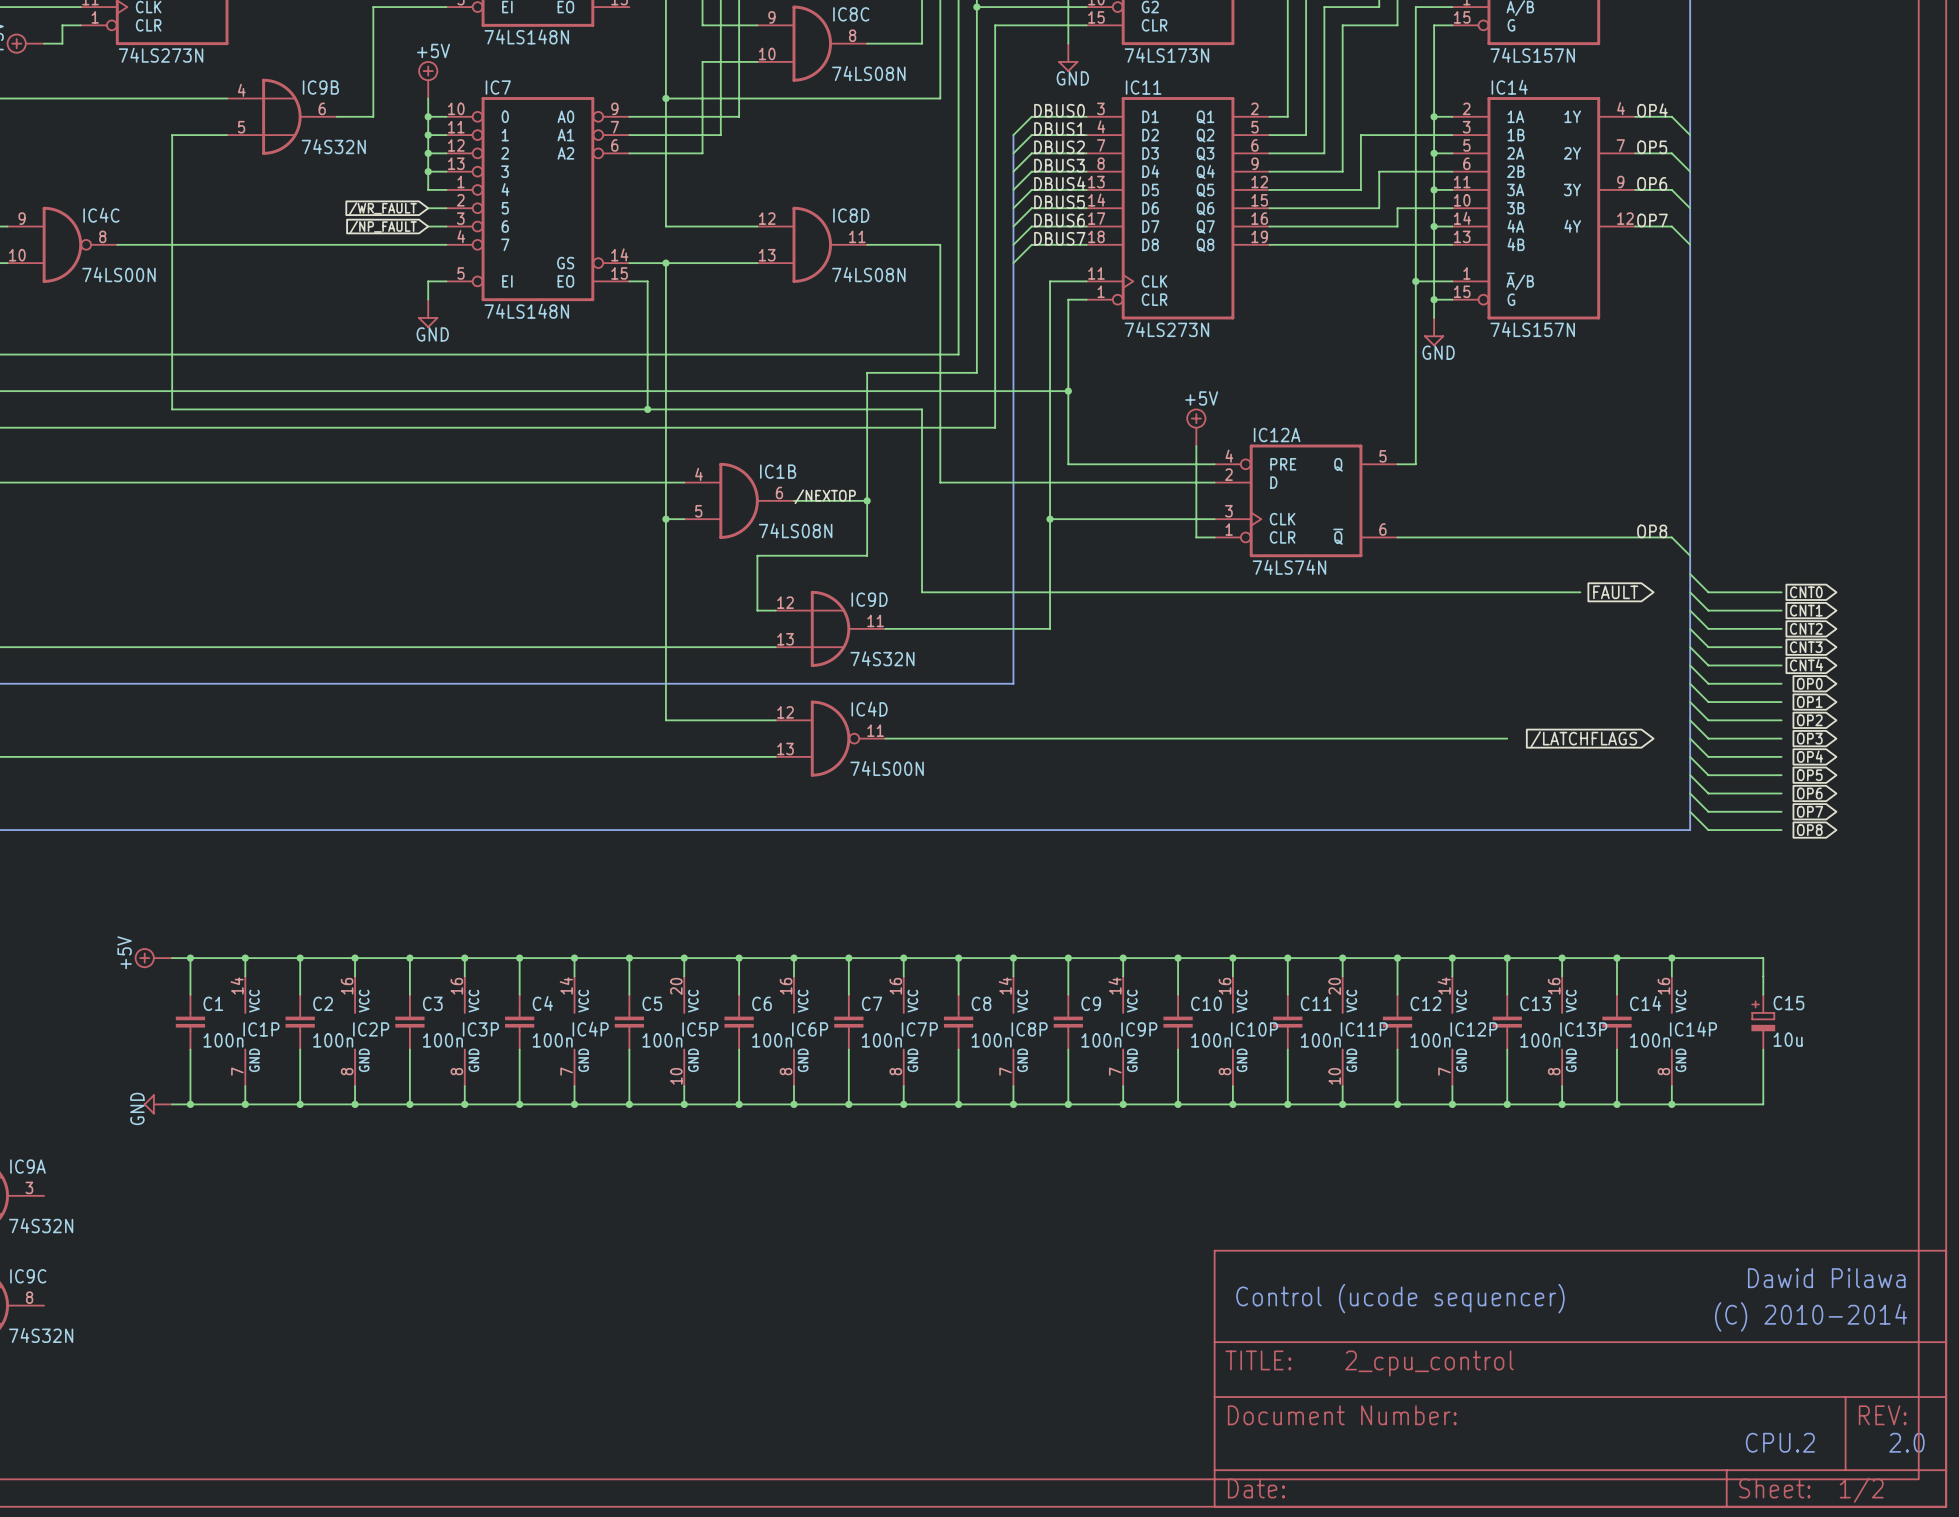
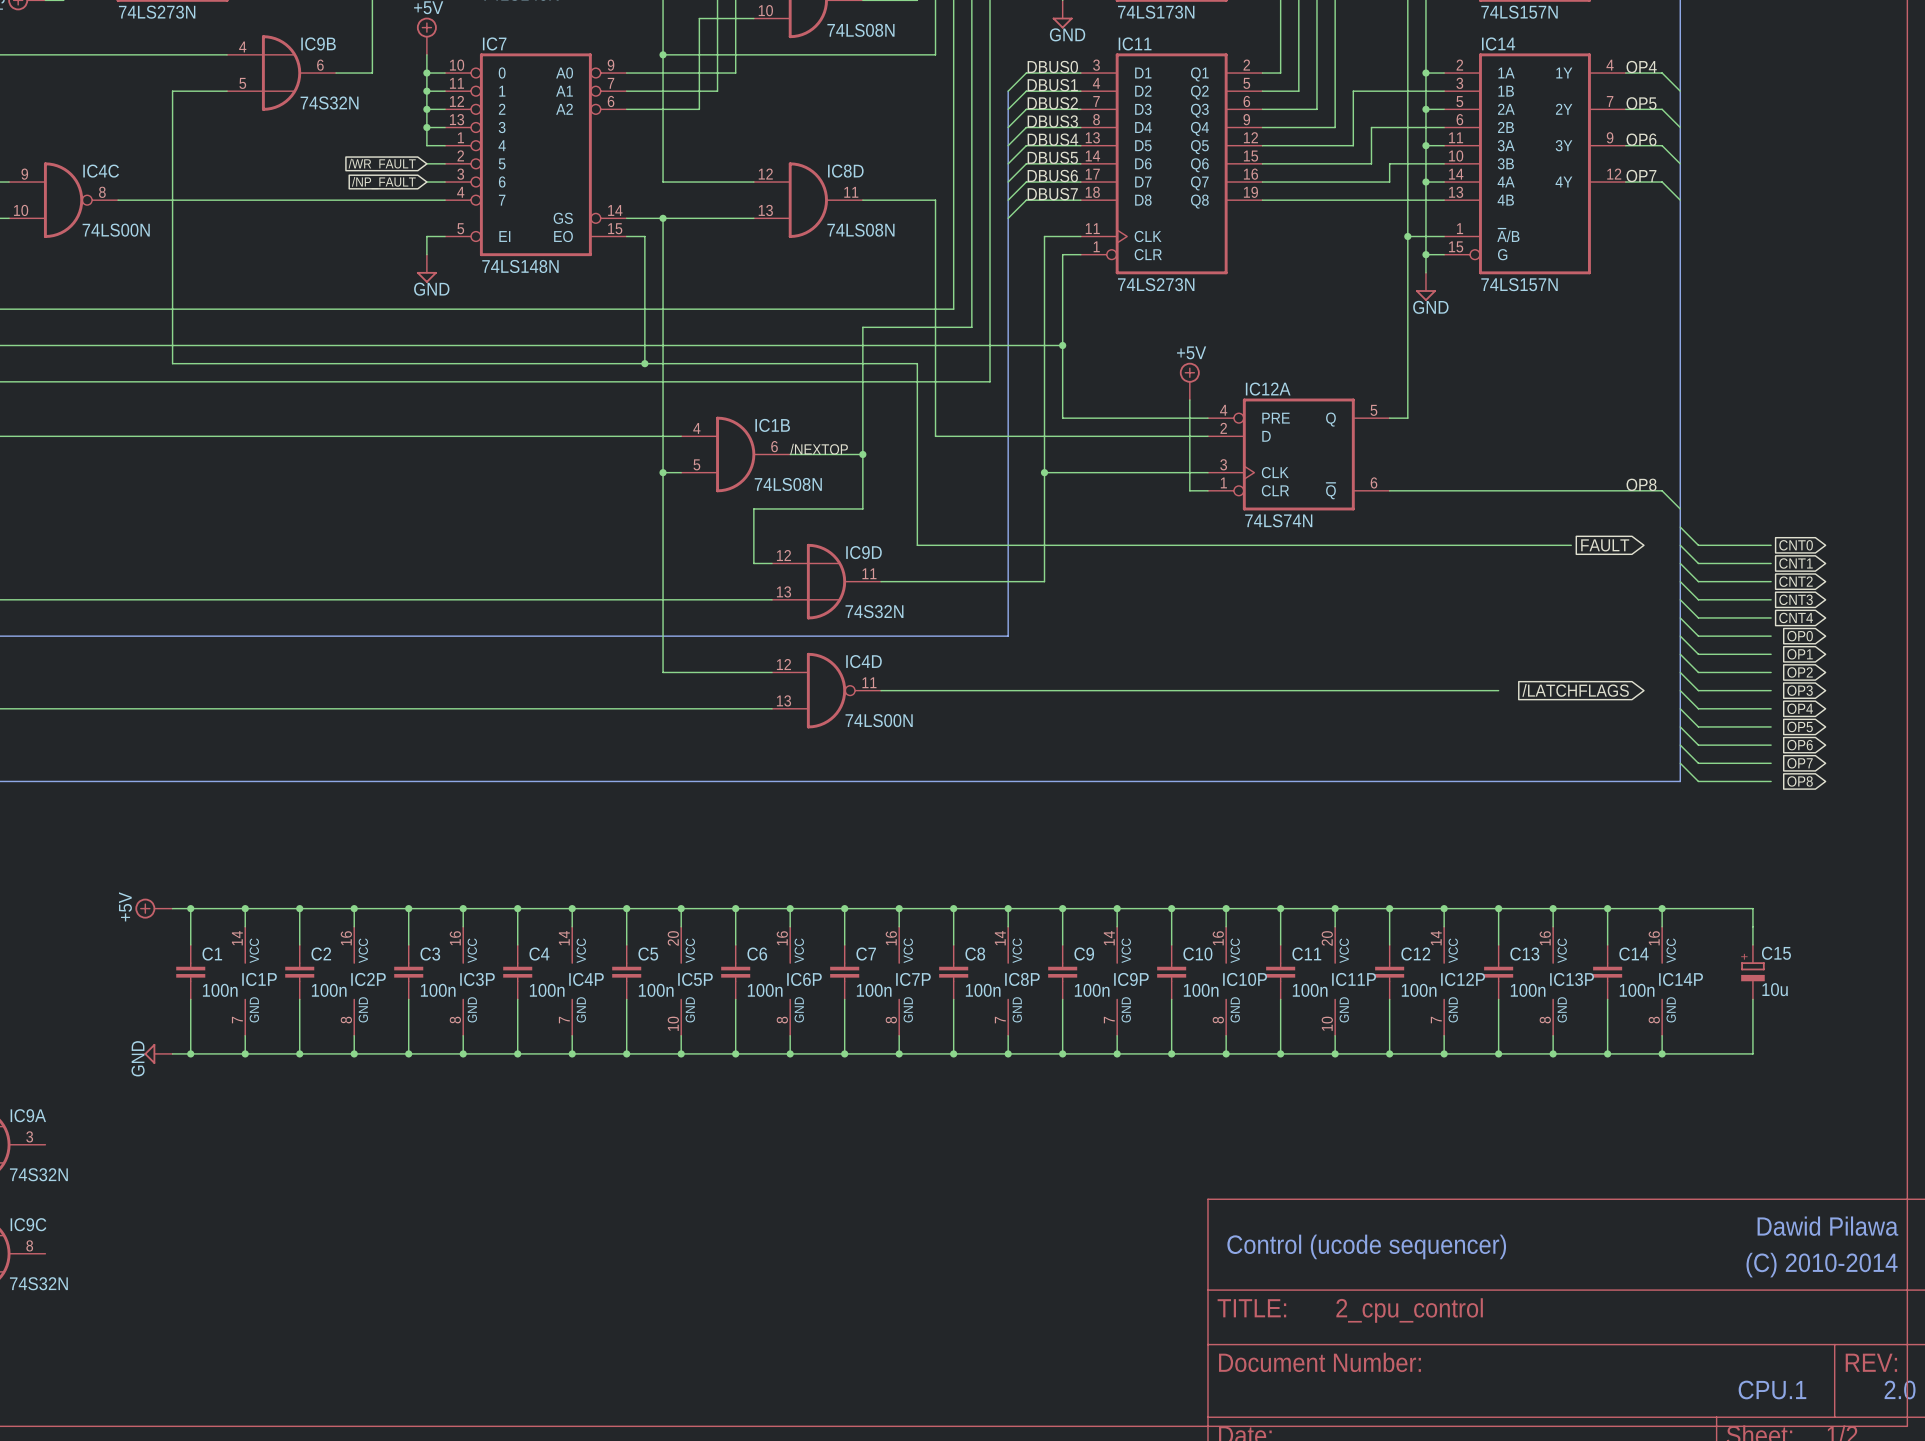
text: CPU.2 (1780, 1442) -> CPU.1 (1772, 1389)

